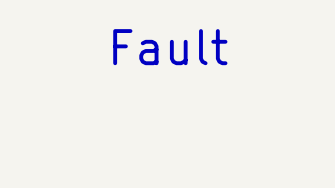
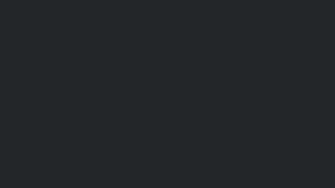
text: Fault (170, 47) -> none

